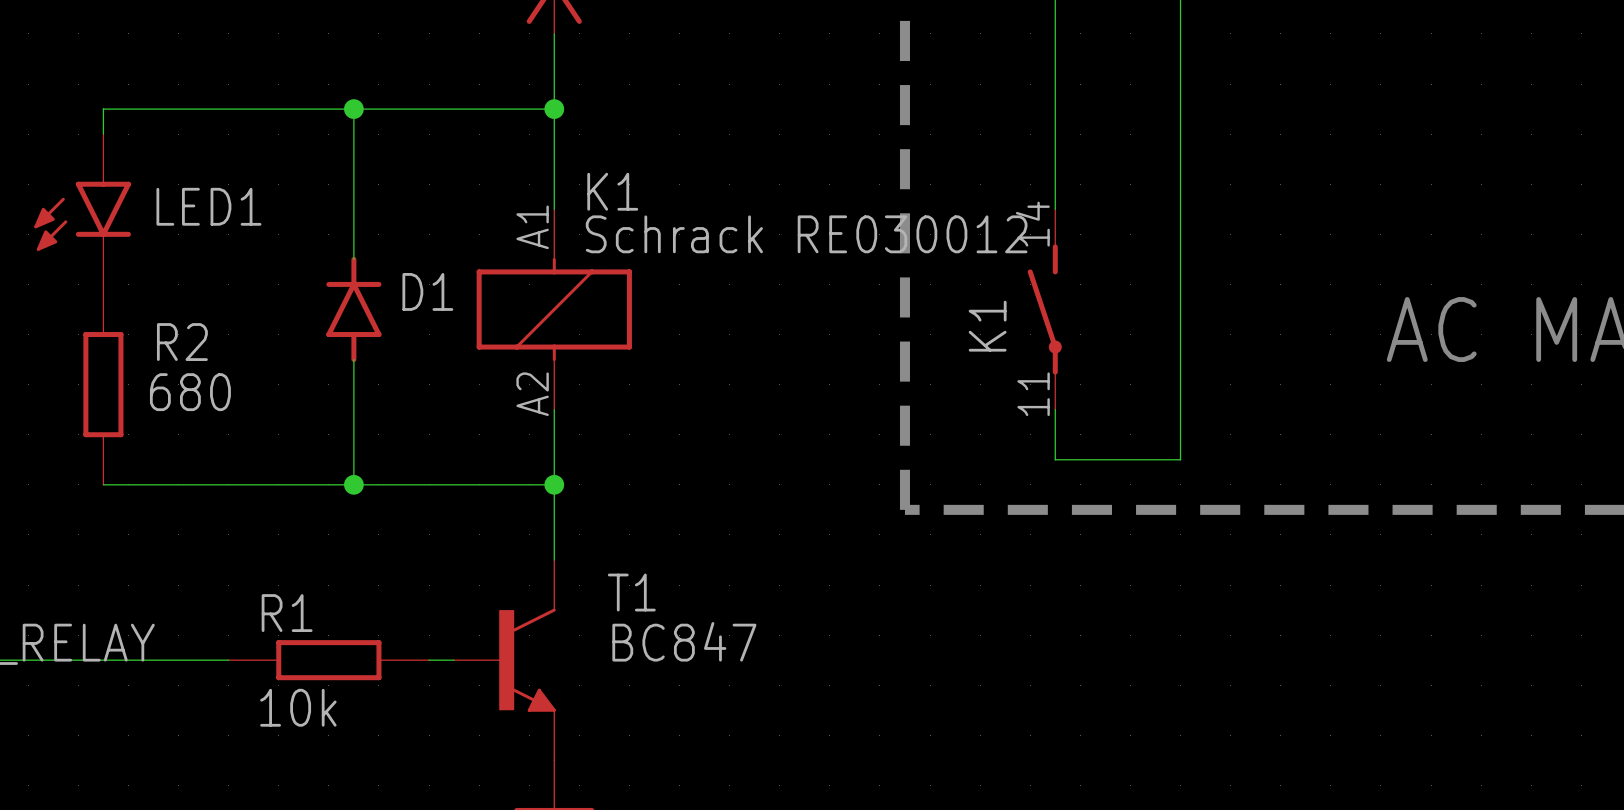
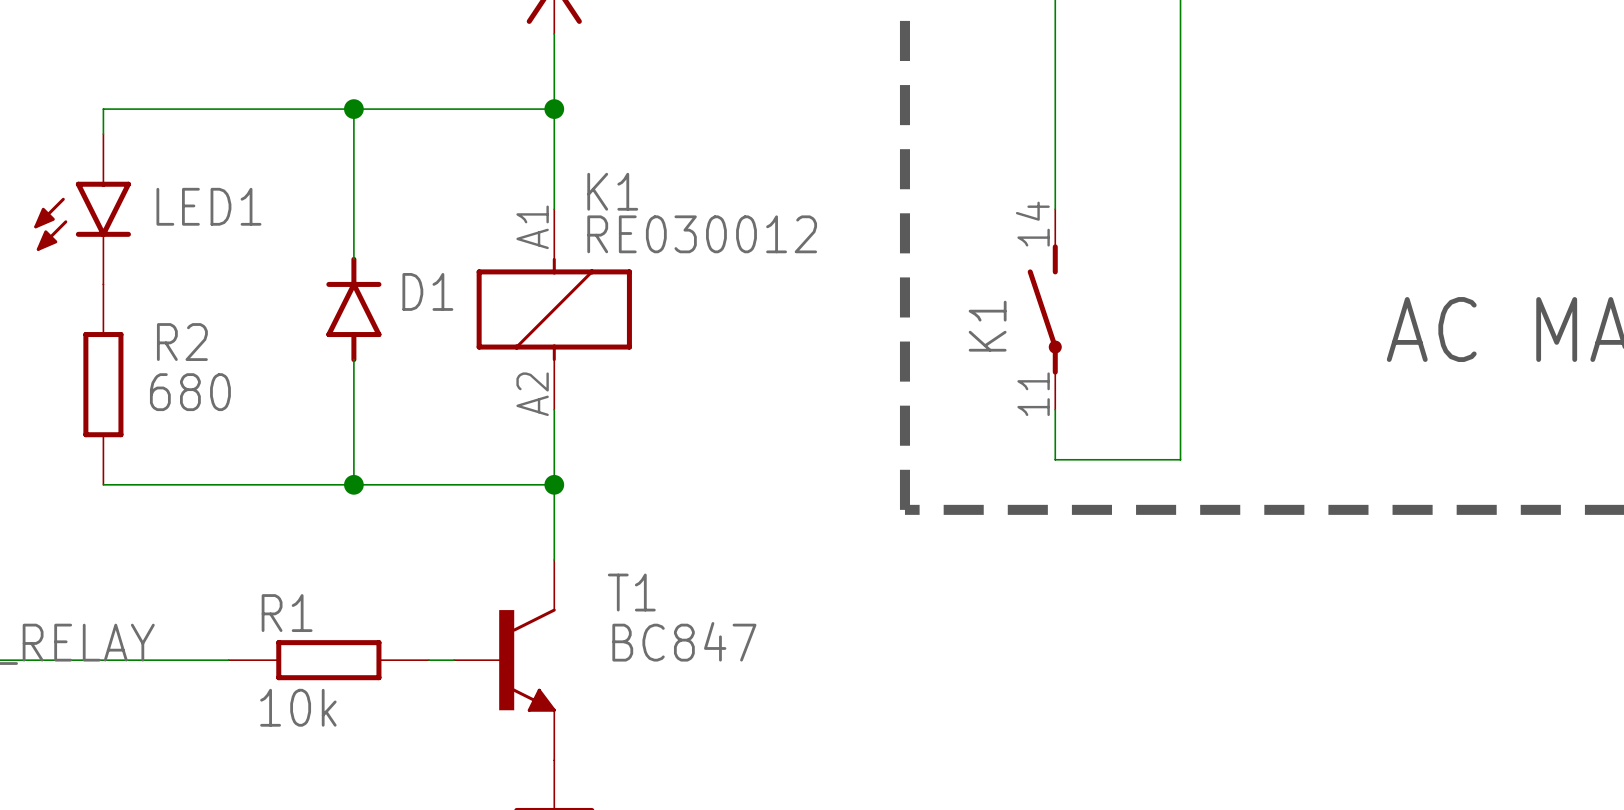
K1 value: Schrack RE030012 (806, 234) -> RE030012 (702, 234)

